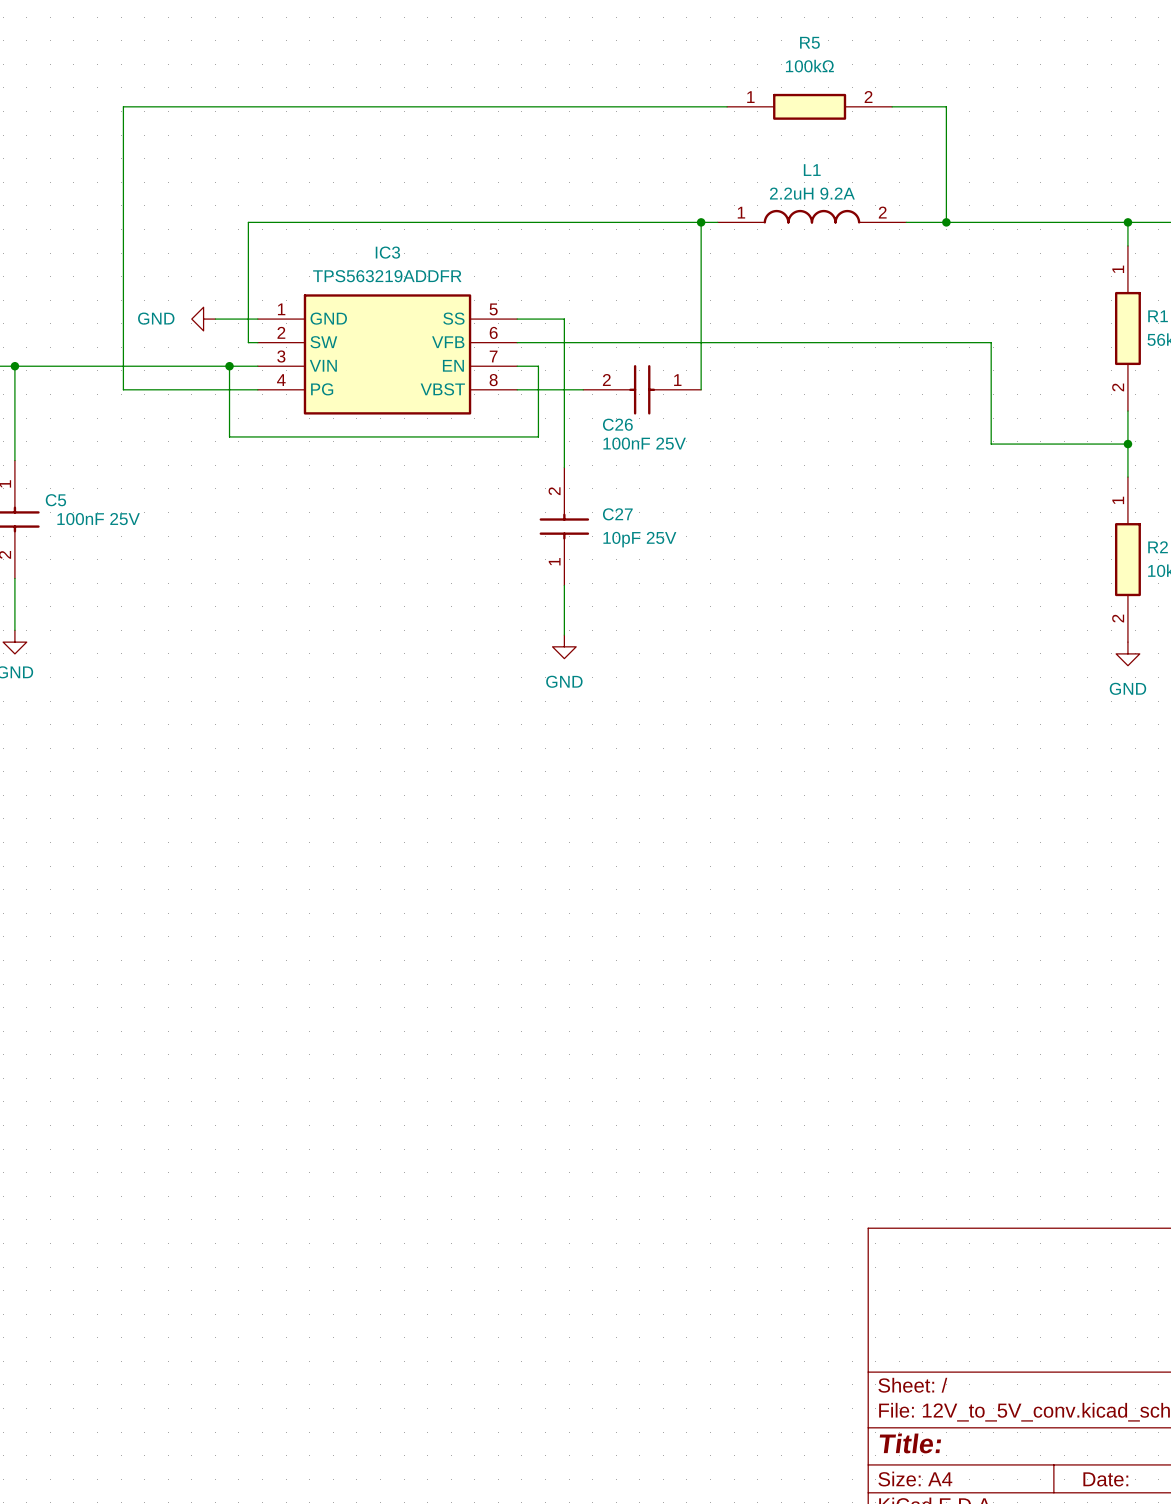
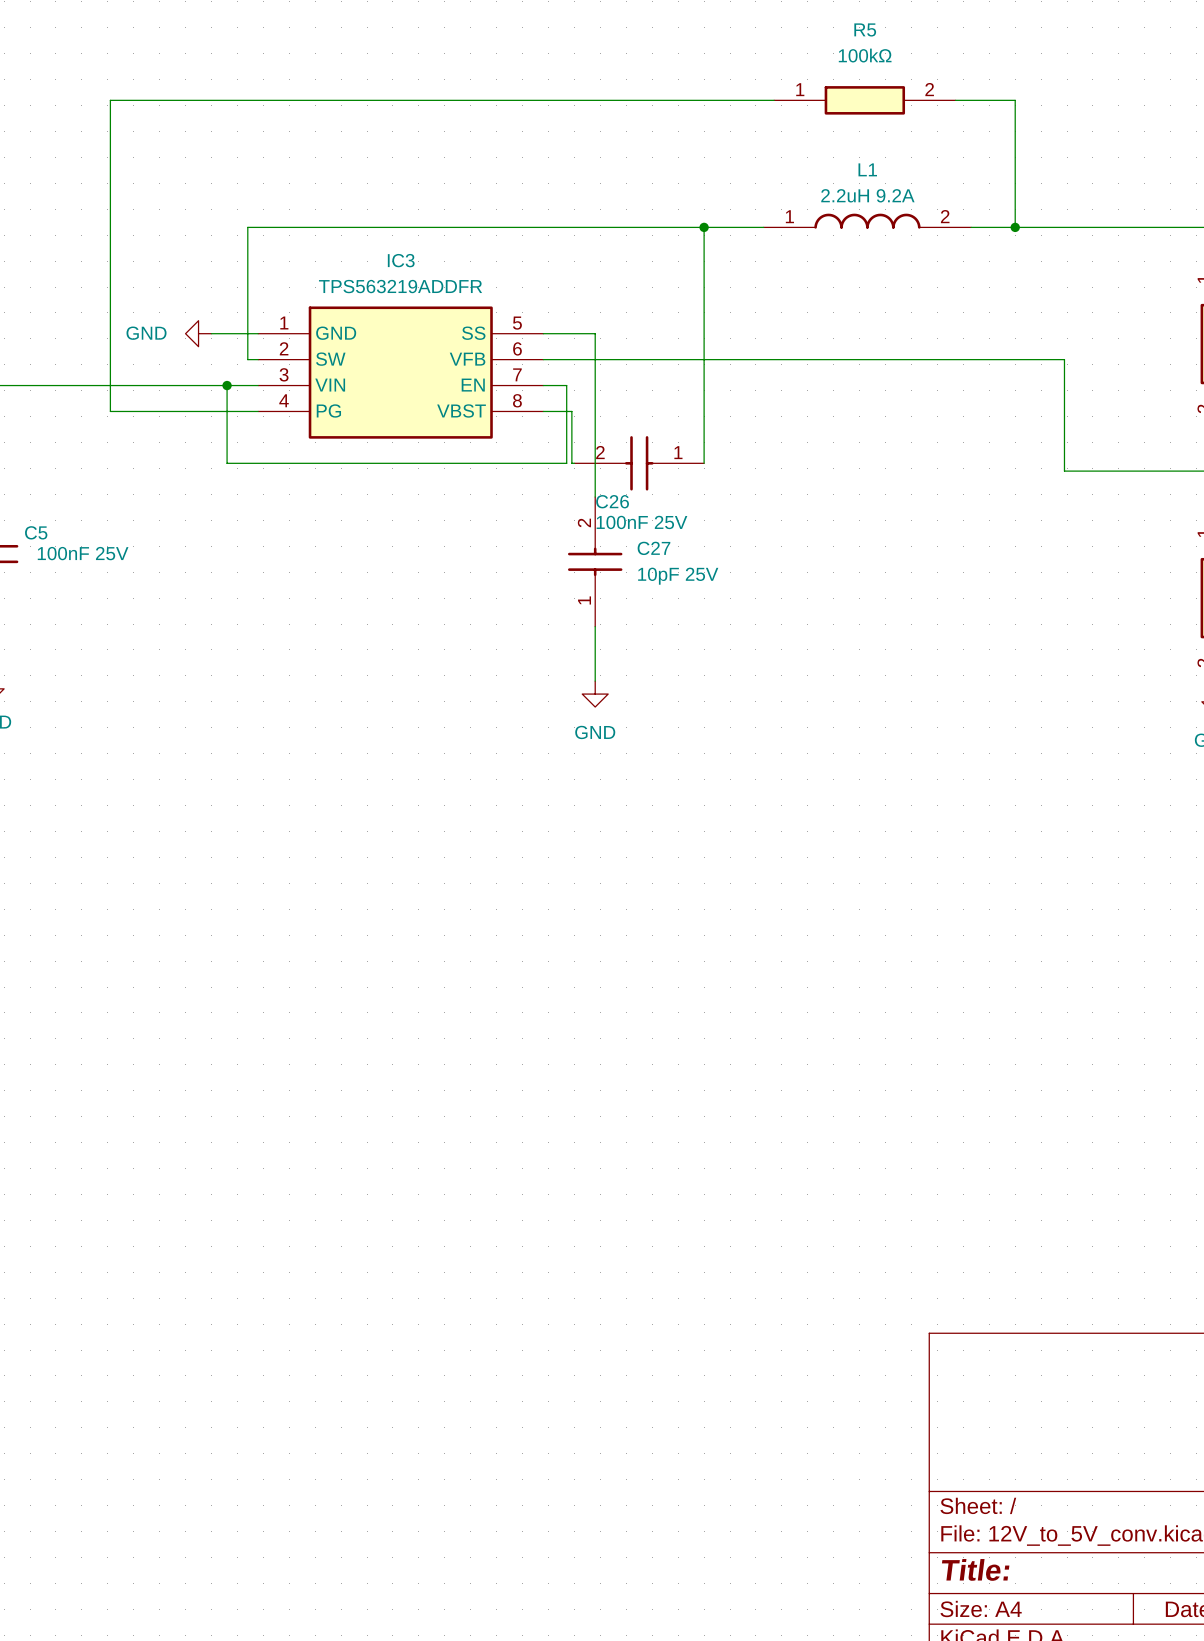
wire: none -> (704, 227) (704, 463)
wire: (701, 222) (701, 389) -> none
junction position: (701, 222) -> (704, 227)
wire: (543, 389) (583, 389) -> (571, 411) (571, 463) (574, 463)
C26 position: (642, 389) -> (639, 463)

